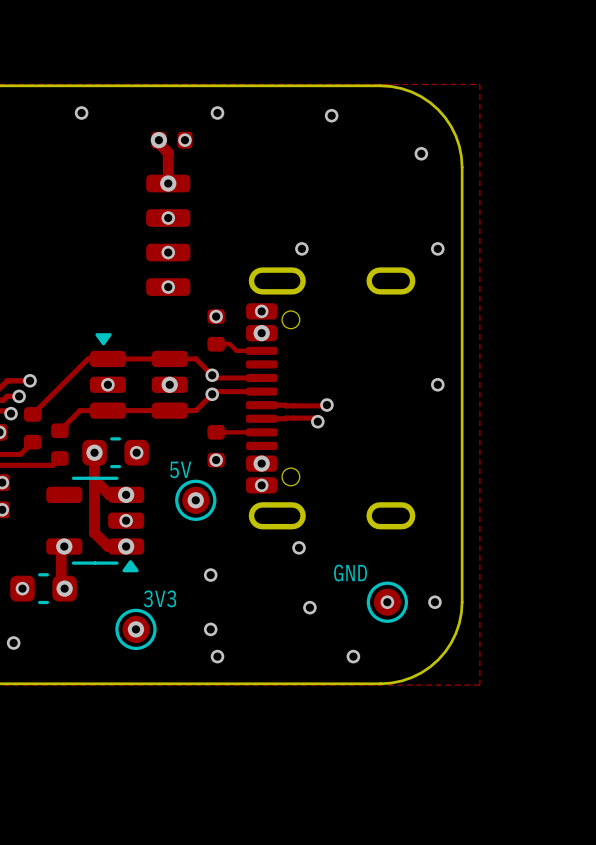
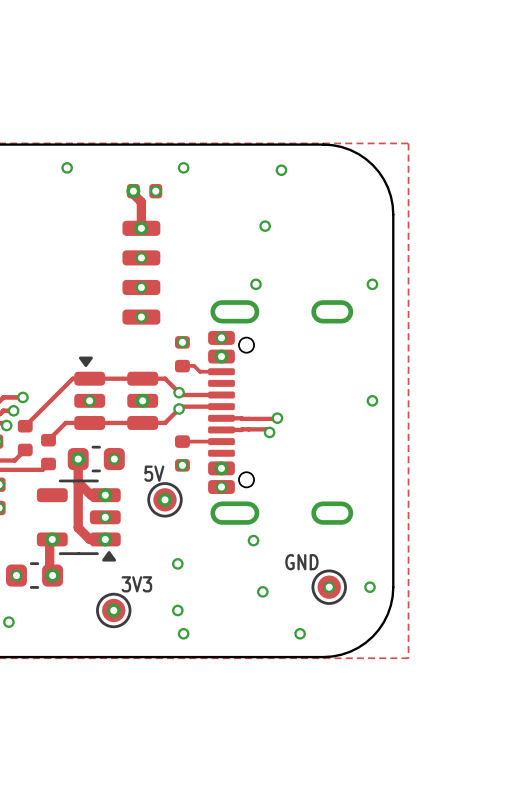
via position: (421, 153) -> (265, 226)

